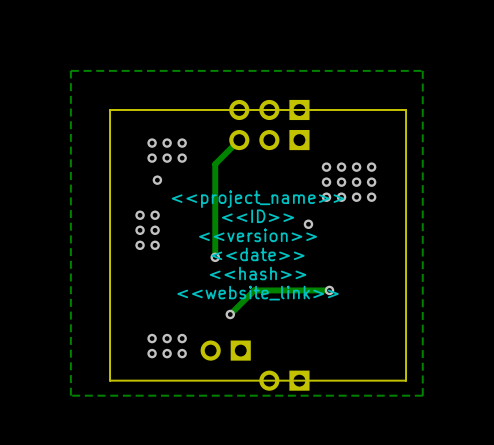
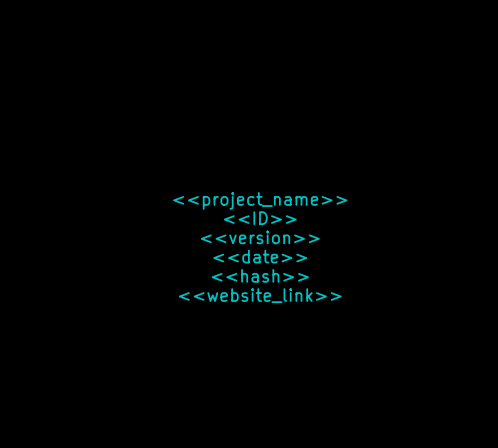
zone outline: (422, 70) (70, 70) (70, 395) (422, 395) (422, 70) -> none
part: (269, 109) -> none
board edge: (406, 109) (110, 109) (110, 380) (406, 380) (406, 109) -> none
track: (239, 140) (215, 164) (215, 257) -> none
part: (269, 140) -> none
via: (152, 143) -> none
via: (167, 143) -> none
via: (182, 143) -> none
via: (152, 158) -> none
via: (167, 158) -> none
via: (182, 158) -> none
via: (326, 167) -> none
via: (341, 167) -> none
via: (356, 167) -> none
via: (371, 167) -> none
via: (157, 180) -> none
via: (326, 182) -> none
via: (341, 182) -> none
via: (356, 182) -> none
via: (371, 182) -> none
via: (326, 197) -> none
via: (341, 197) -> none
via: (356, 197) -> none
via: (371, 197) -> none
via: (140, 215) -> none
via: (155, 215) -> none
via: (308, 224) -> none
via: (140, 230) -> none
via: (155, 230) -> none
via: (140, 245) -> none
via: (155, 245) -> none
via: (215, 257) -> none
track: (329, 290) (254, 290) (230, 314) -> none
via: (329, 290) -> none
via: (230, 314) -> none
via: (152, 338) -> none
via: (167, 338) -> none
via: (182, 338) -> none
part: (225, 350) -> none
via: (152, 353) -> none
via: (167, 353) -> none
via: (182, 353) -> none
part: (284, 380) -> none

